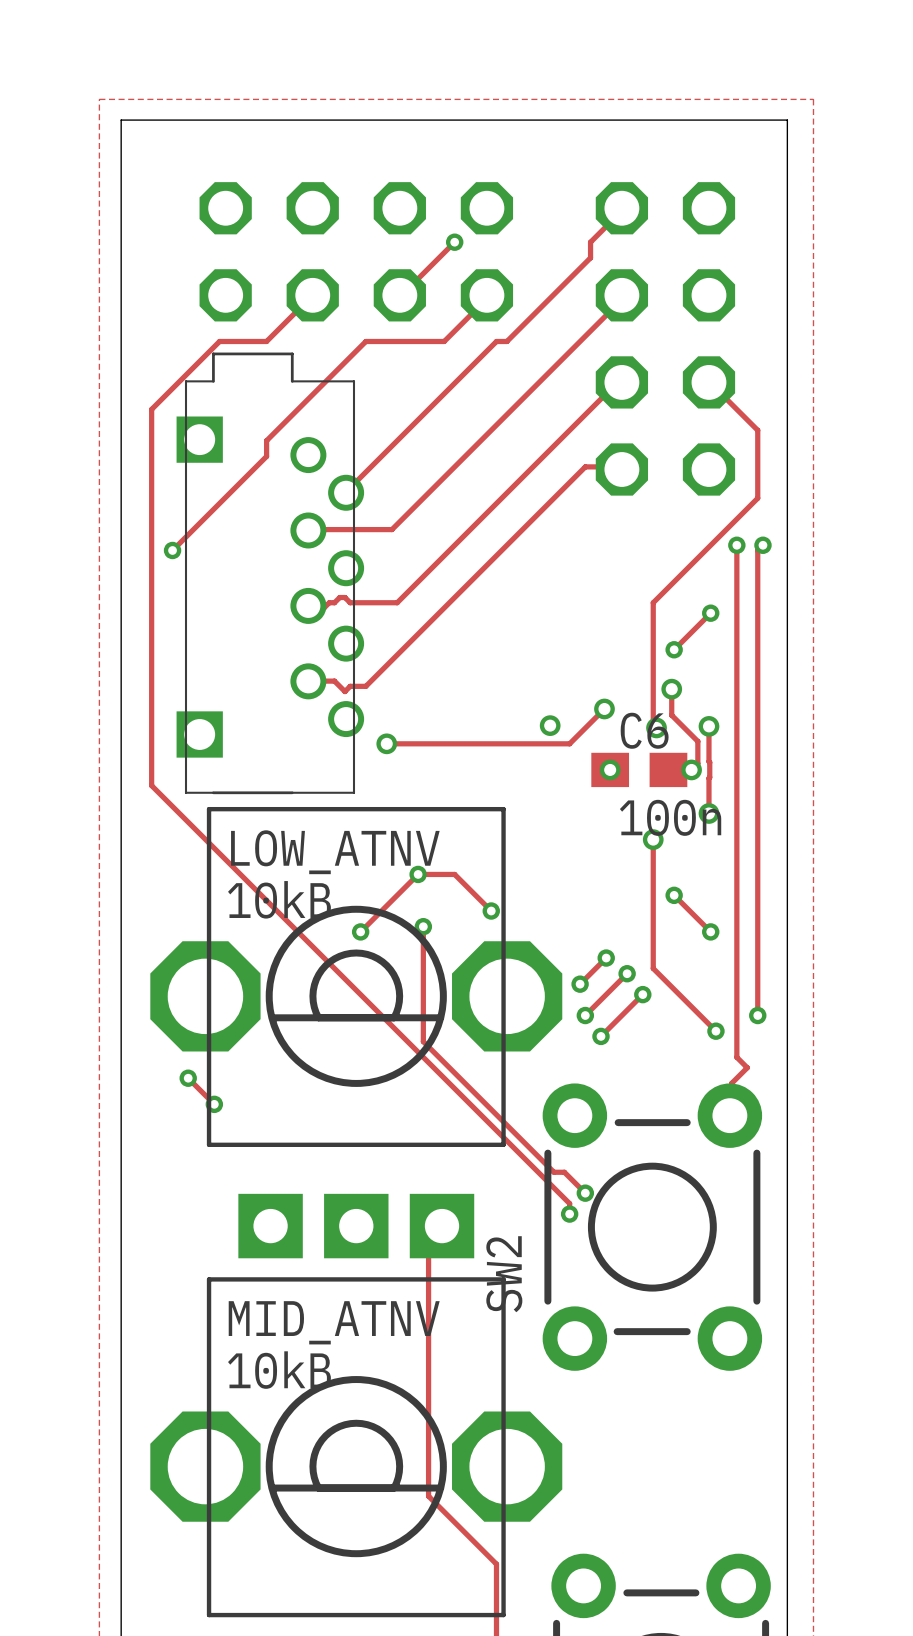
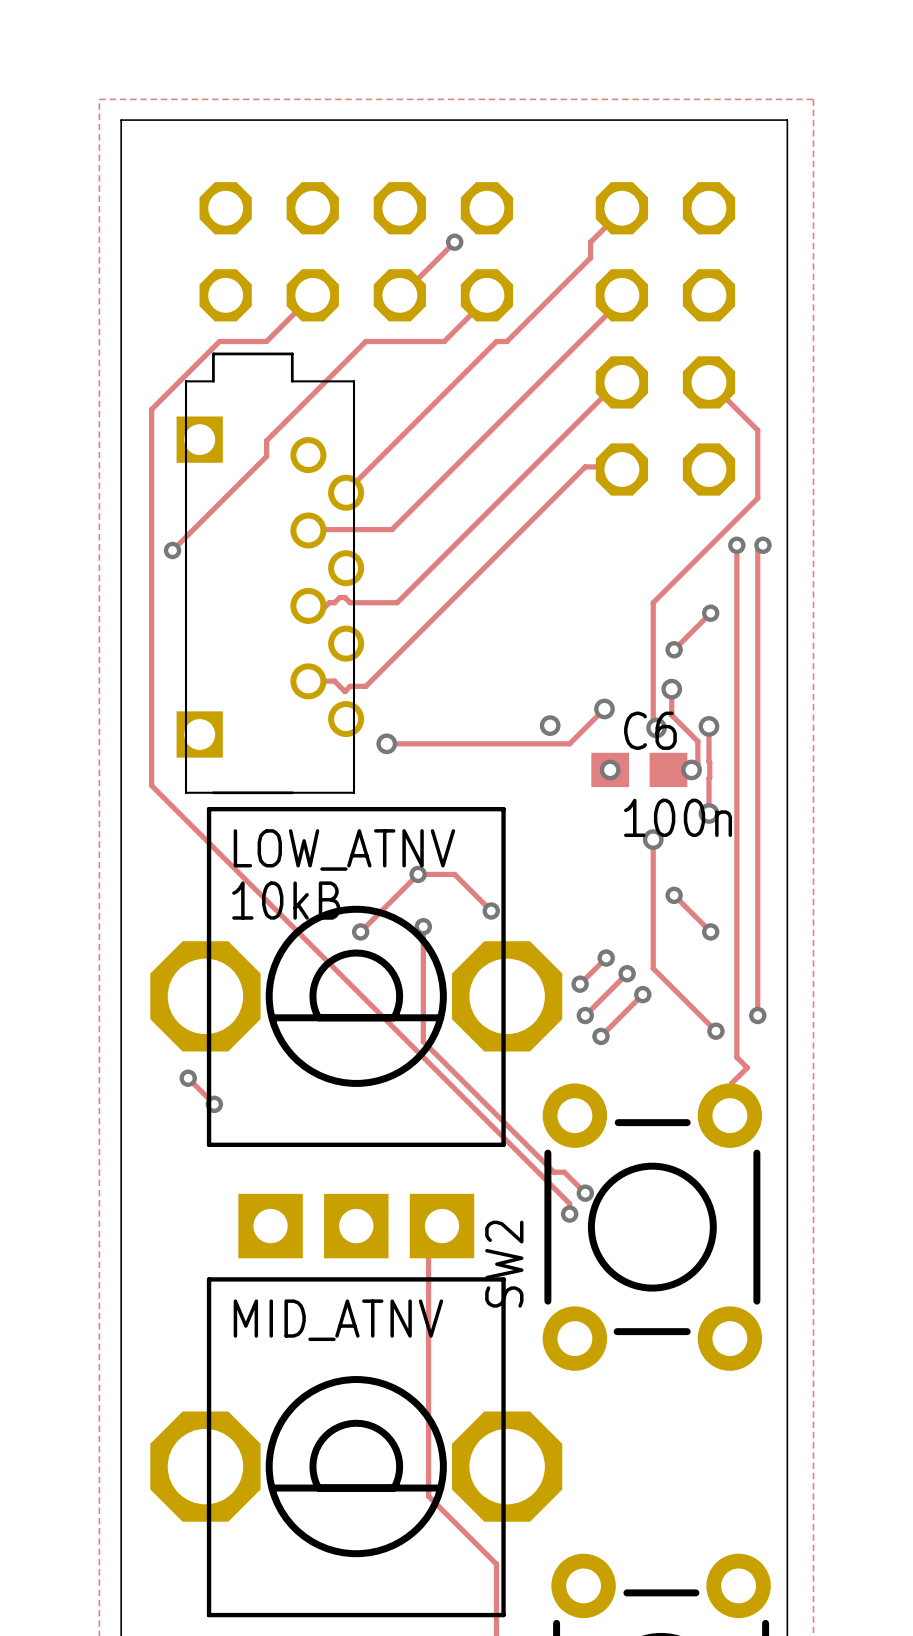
MID_ATNV value: 10kB (279, 1370) -> none

